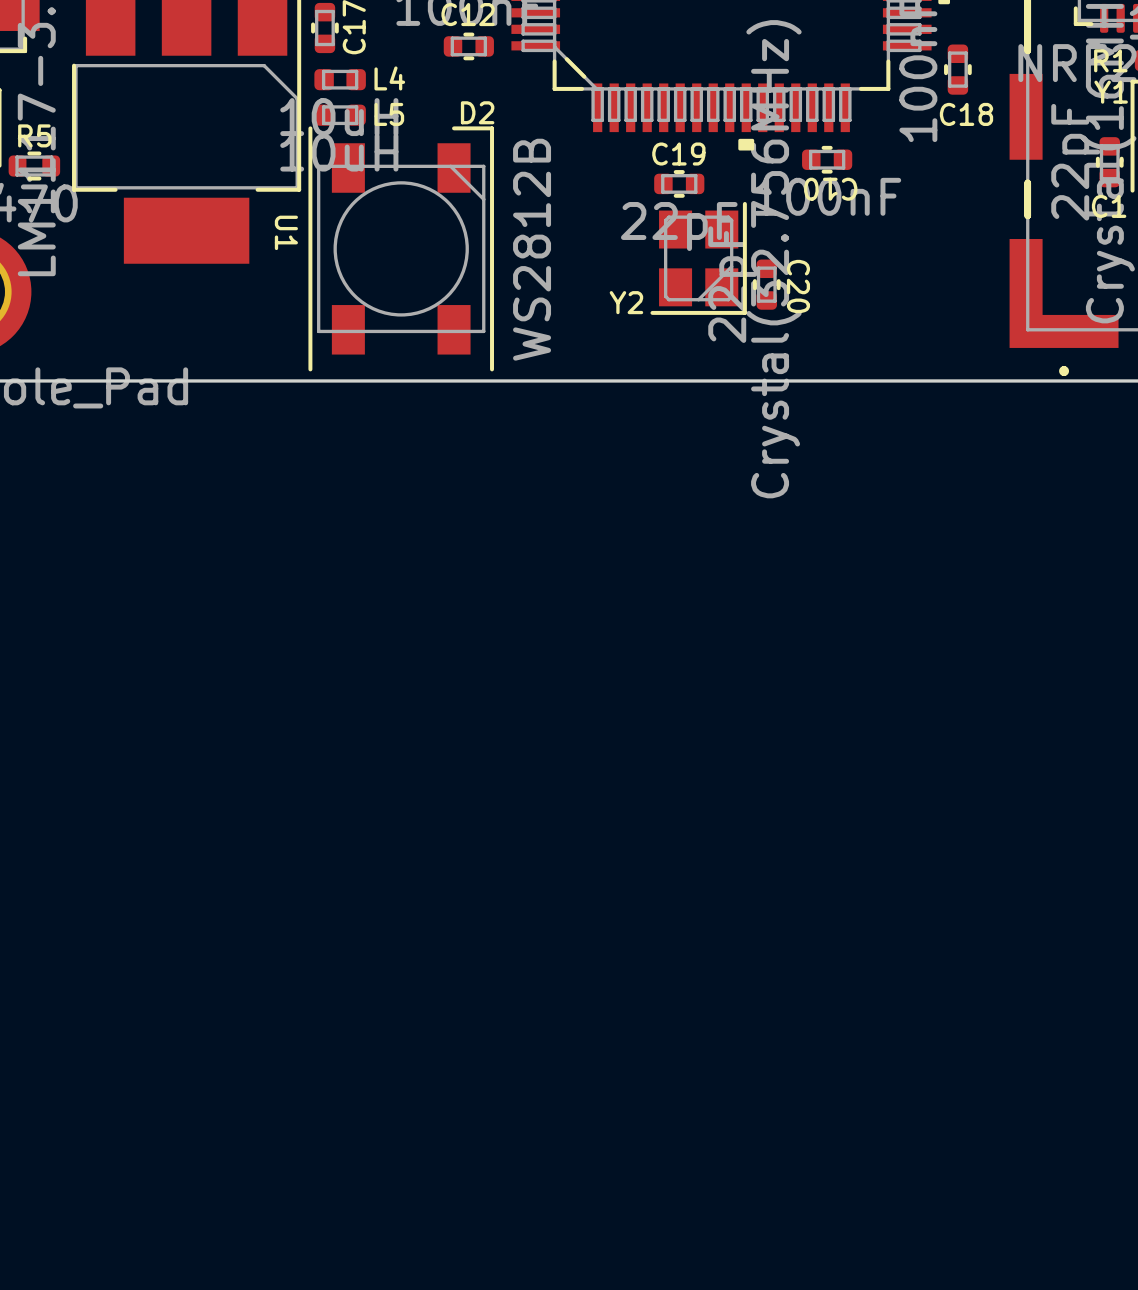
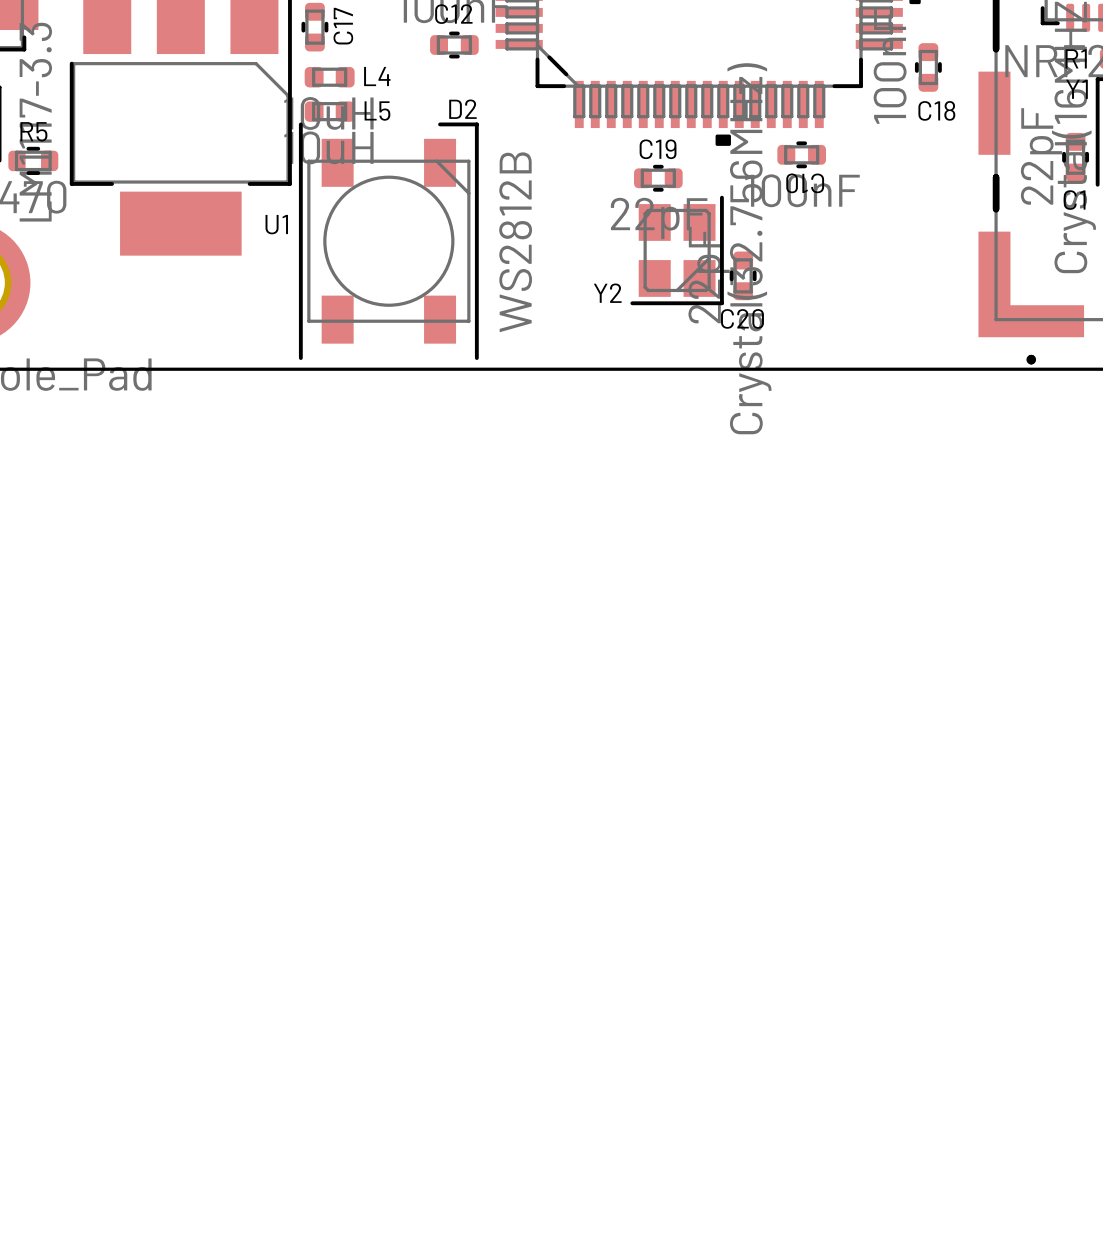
U1 name rotation: 0° (286, 232) -> 90° counterclockwise (276, 224)
C20 name rotation: 0° (798, 286) -> 90° counterclockwise (742, 318)

